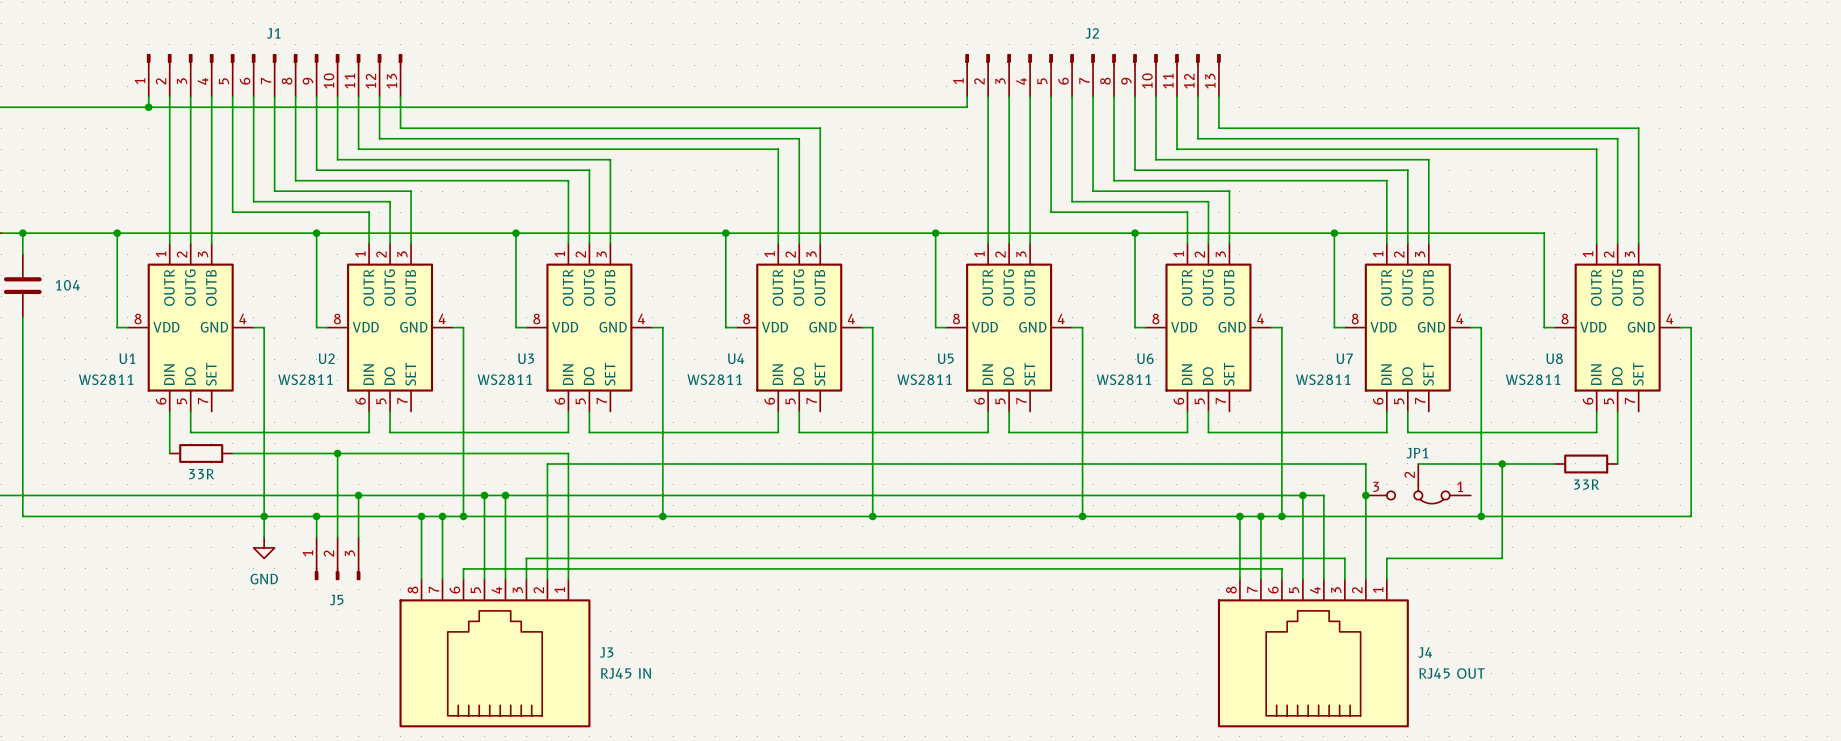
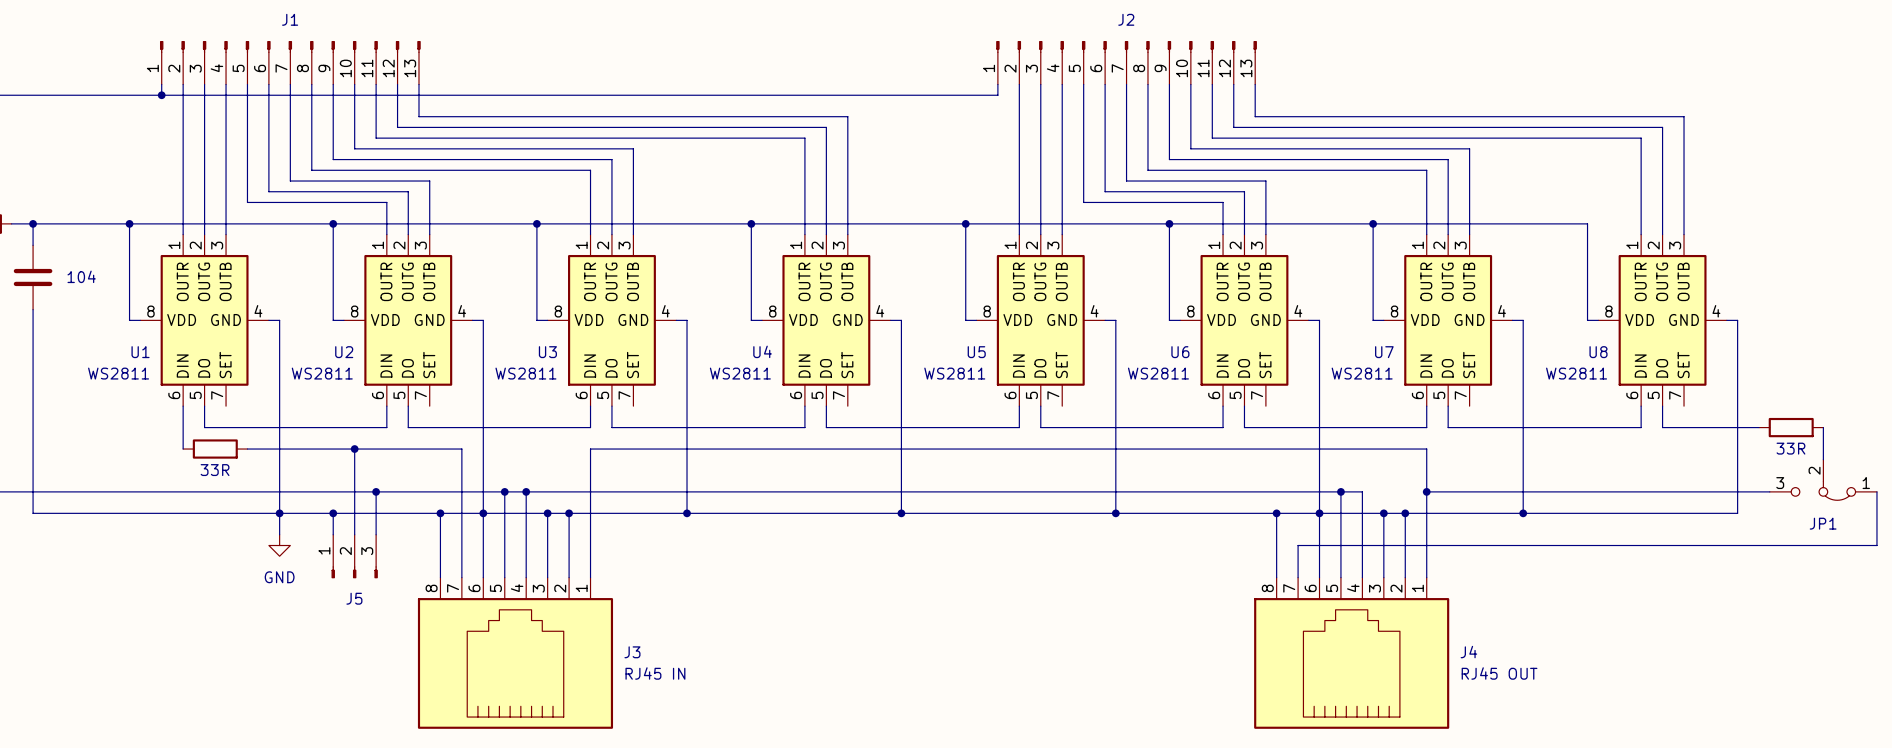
wire: (1617, 432) (1617, 463) -> (1662, 427) (1759, 427)
wire: none -> (1823, 427) (1823, 459)
wire: (442, 453) (568, 453) -> (461, 449) (461, 513)
JP1 name position: JP1 (1417, 453) -> JP1 (1823, 523)
wire: (1418, 463) (1554, 463) -> none
wire: (1502, 463) (1502, 558) (1386, 558) -> (590, 449) (1426, 449) (1426, 556)
junction: (1502, 463) -> none
part position: (1586, 463) -> (1791, 427)
JP1 position: (1418, 483) -> (1823, 480)
junction: (1365, 495) -> none
wire: none -> (1426, 491) (1769, 491)
junction: none -> (1426, 491)
junction: (442, 516) -> none
junction: none -> (547, 513)
wire: (547, 516) (547, 463) (1365, 463) (1365, 516) -> none
junction: none -> (569, 513)
wire: (1260, 516) (1260, 547) -> (1876, 491) (1876, 545) (1298, 545)
junction: (1260, 516) -> none
wire: none -> (1319, 513) (1319, 566)
wire: none -> (1383, 513) (1383, 556)
junction: none -> (1383, 513)
junction: none -> (1405, 513)
wire: (526, 558) (1344, 558) -> (547, 556) (547, 513)
wire: (463, 568) (1281, 568) -> (483, 566) (483, 513)

